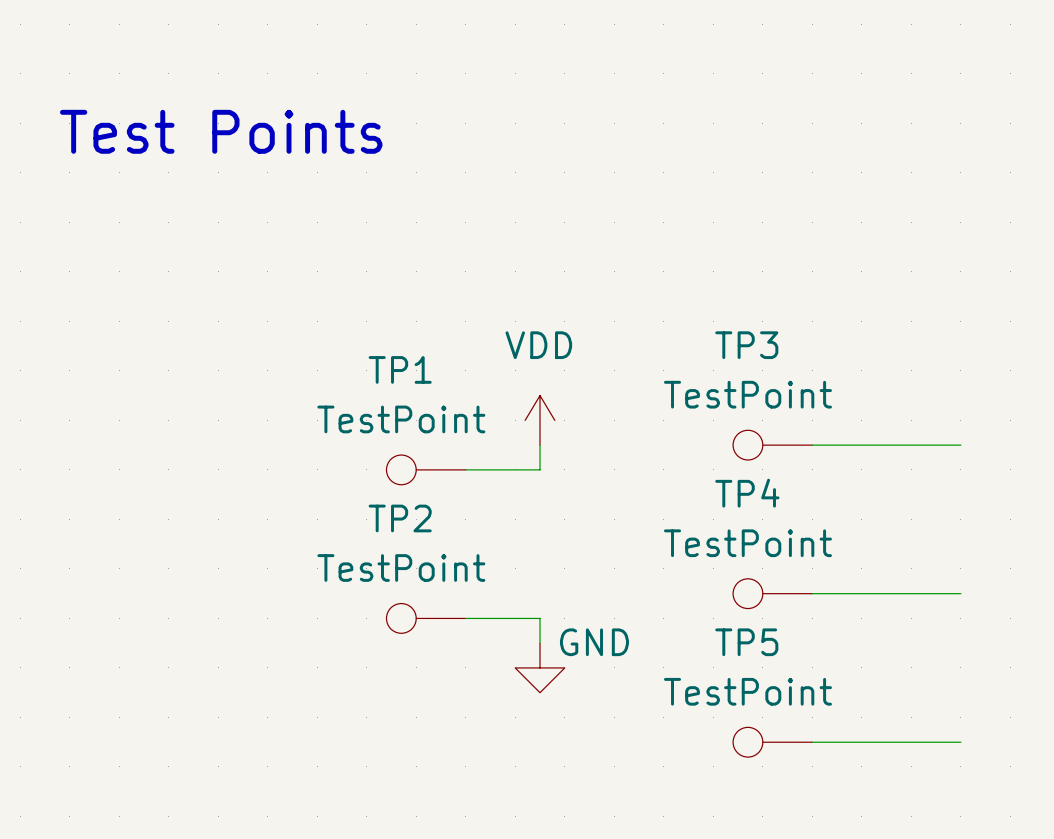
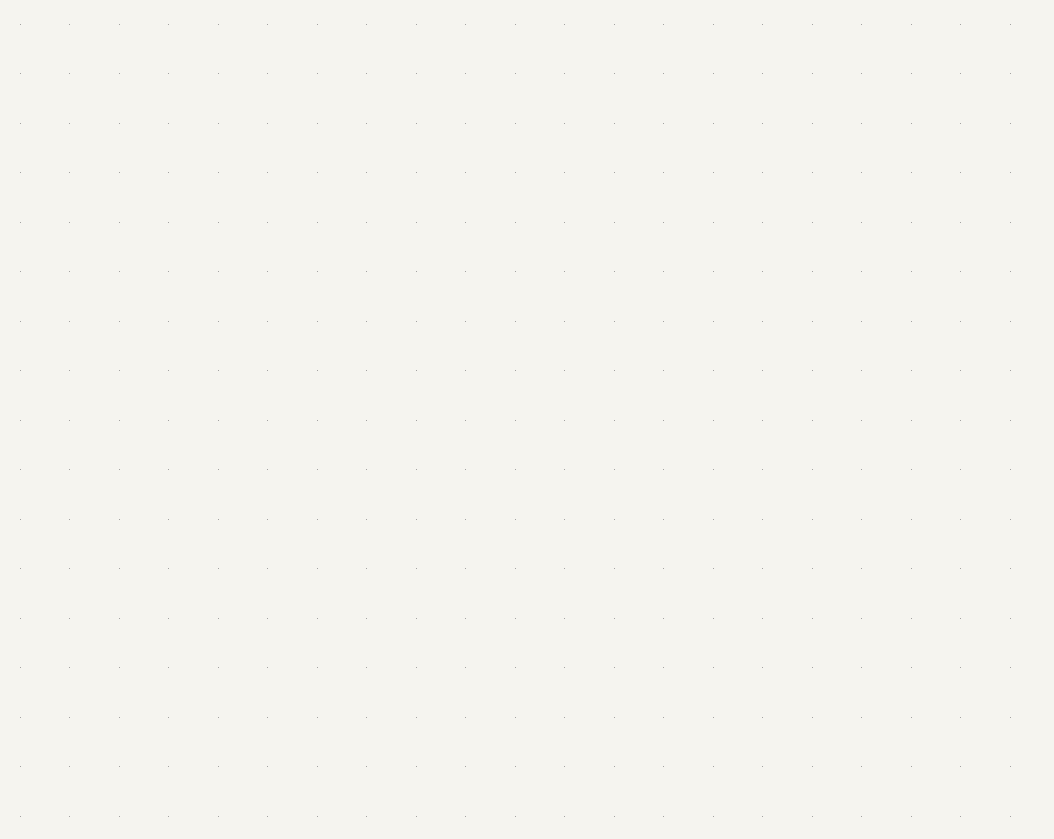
text: Test Points (221, 131) -> none
power symbol: VDD (539, 420) -> none
wire: (539, 445) (539, 469) (465, 469) -> none
TP3: TestPoint (772, 445) -> none
wire: (812, 445) (960, 445) -> none
TP1: TestPoint (426, 469) -> none
TP4: TestPoint (772, 593) -> none
wire: (812, 593) (960, 593) -> none
TP2: TestPoint (426, 618) -> none
wire: (465, 618) (539, 618) (539, 643) -> none
power symbol: GND (539, 667) -> none
TP5: TestPoint (772, 742) -> none
wire: (812, 742) (960, 742) -> none

